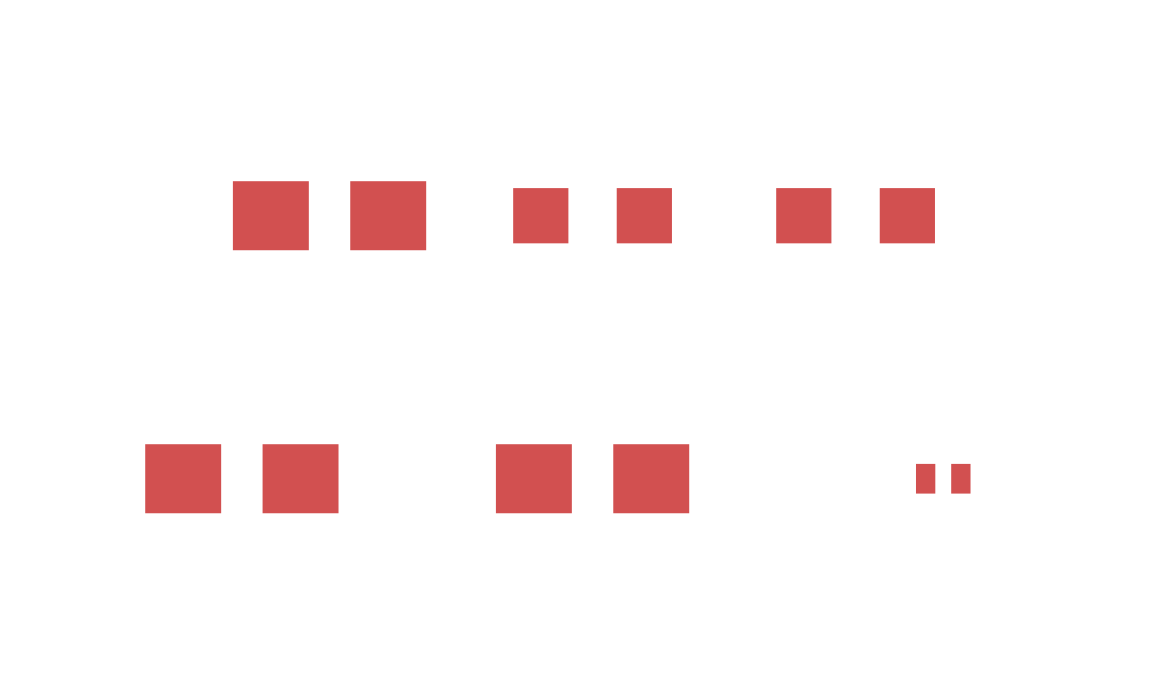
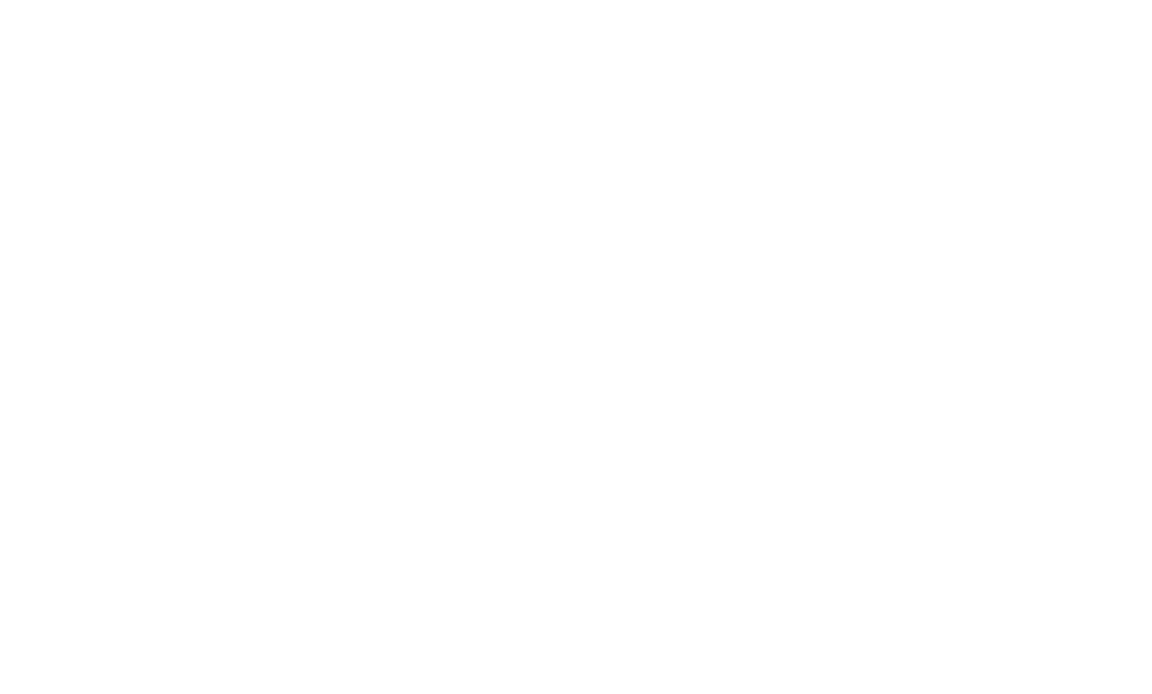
part: (329, 215) -> none
part: (592, 215) -> none
part: (855, 215) -> none
part: (241, 478) -> none
part: (592, 478) -> none
part: (943, 478) -> none

